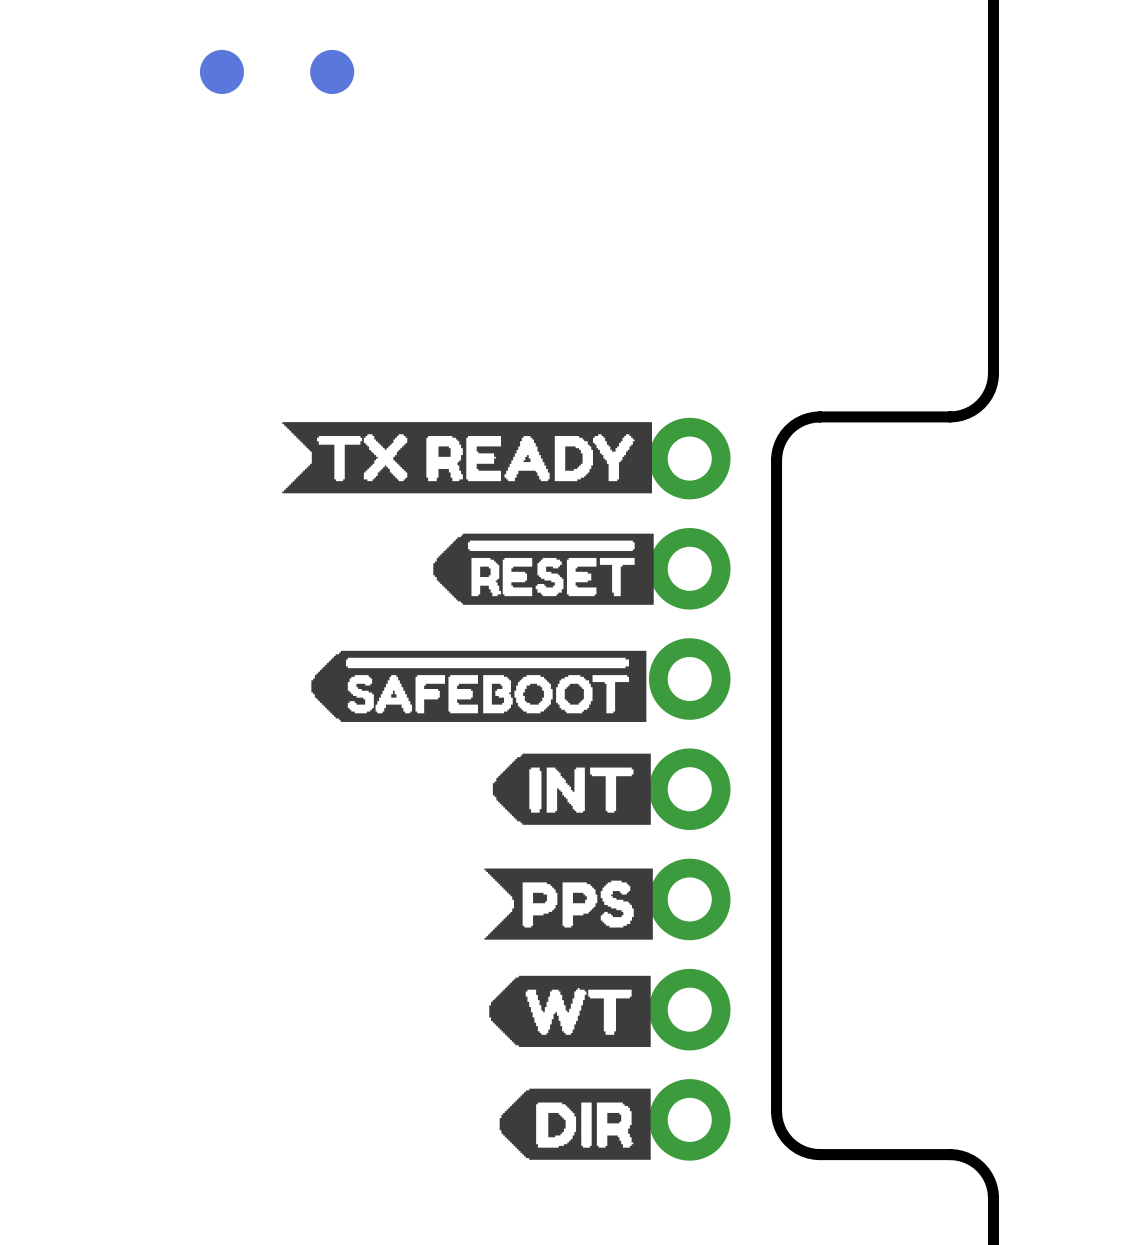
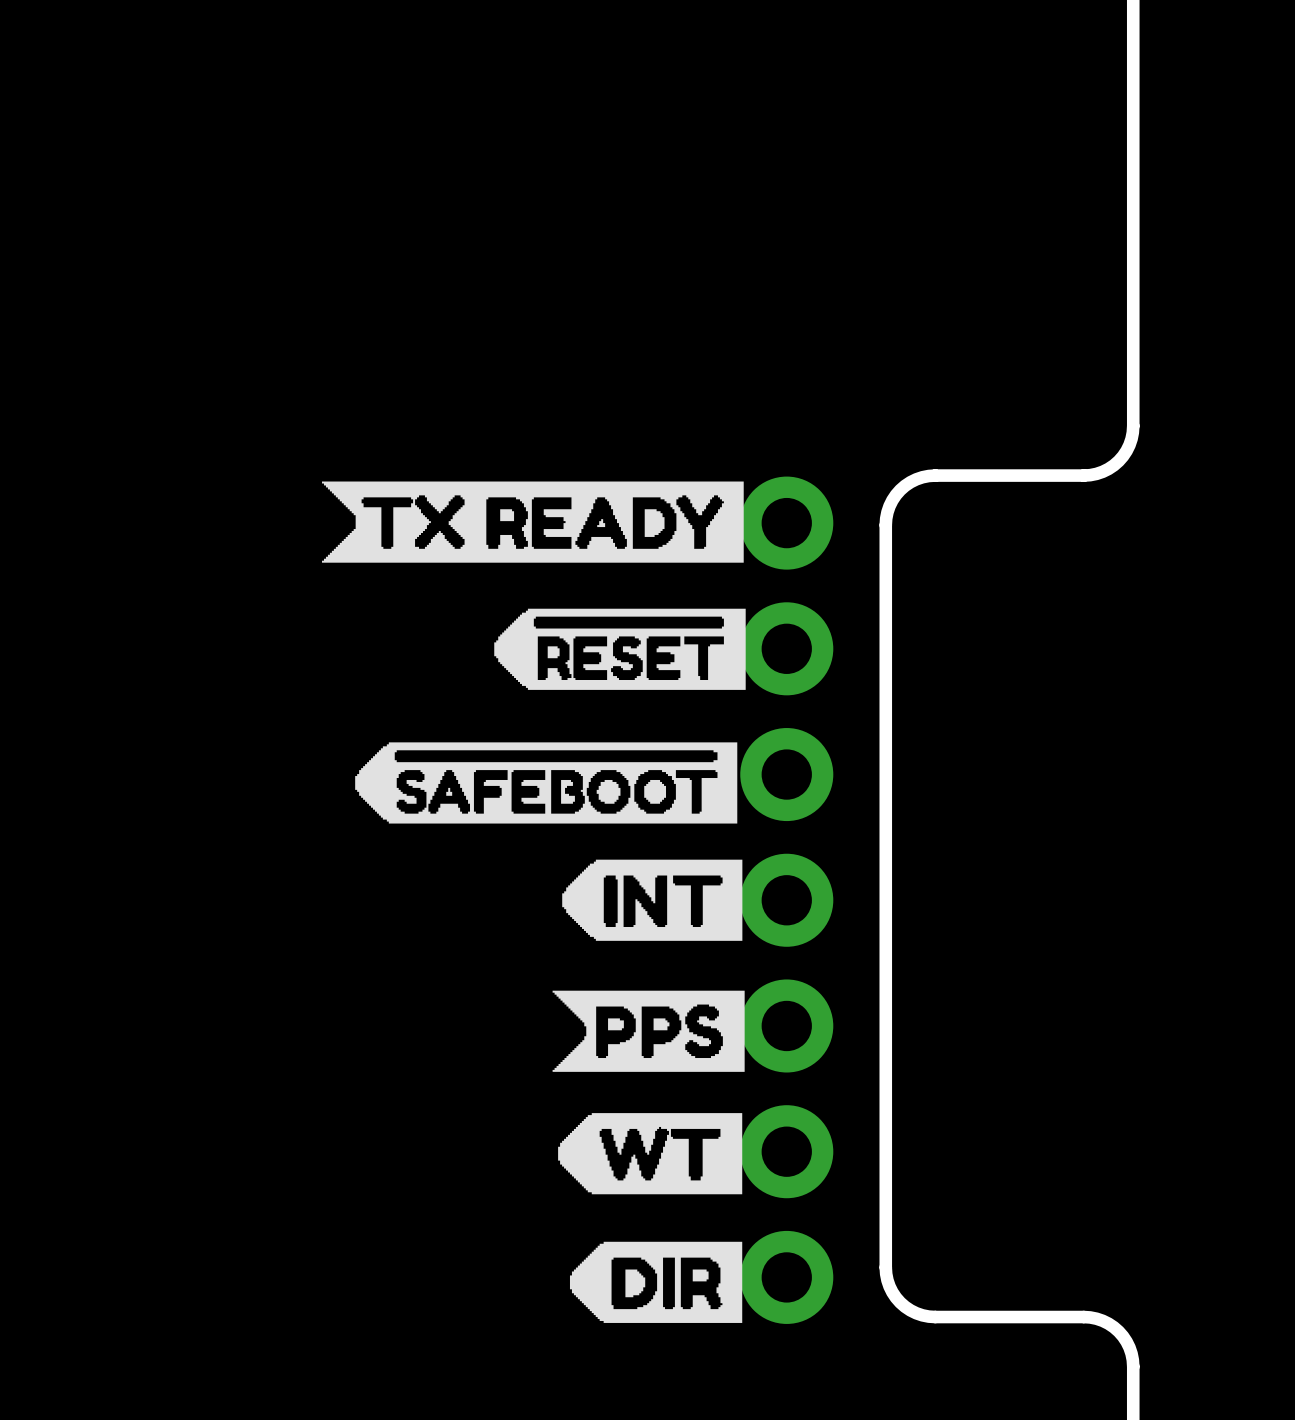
part: (221, 71) -> none
part: (332, 71) -> none

